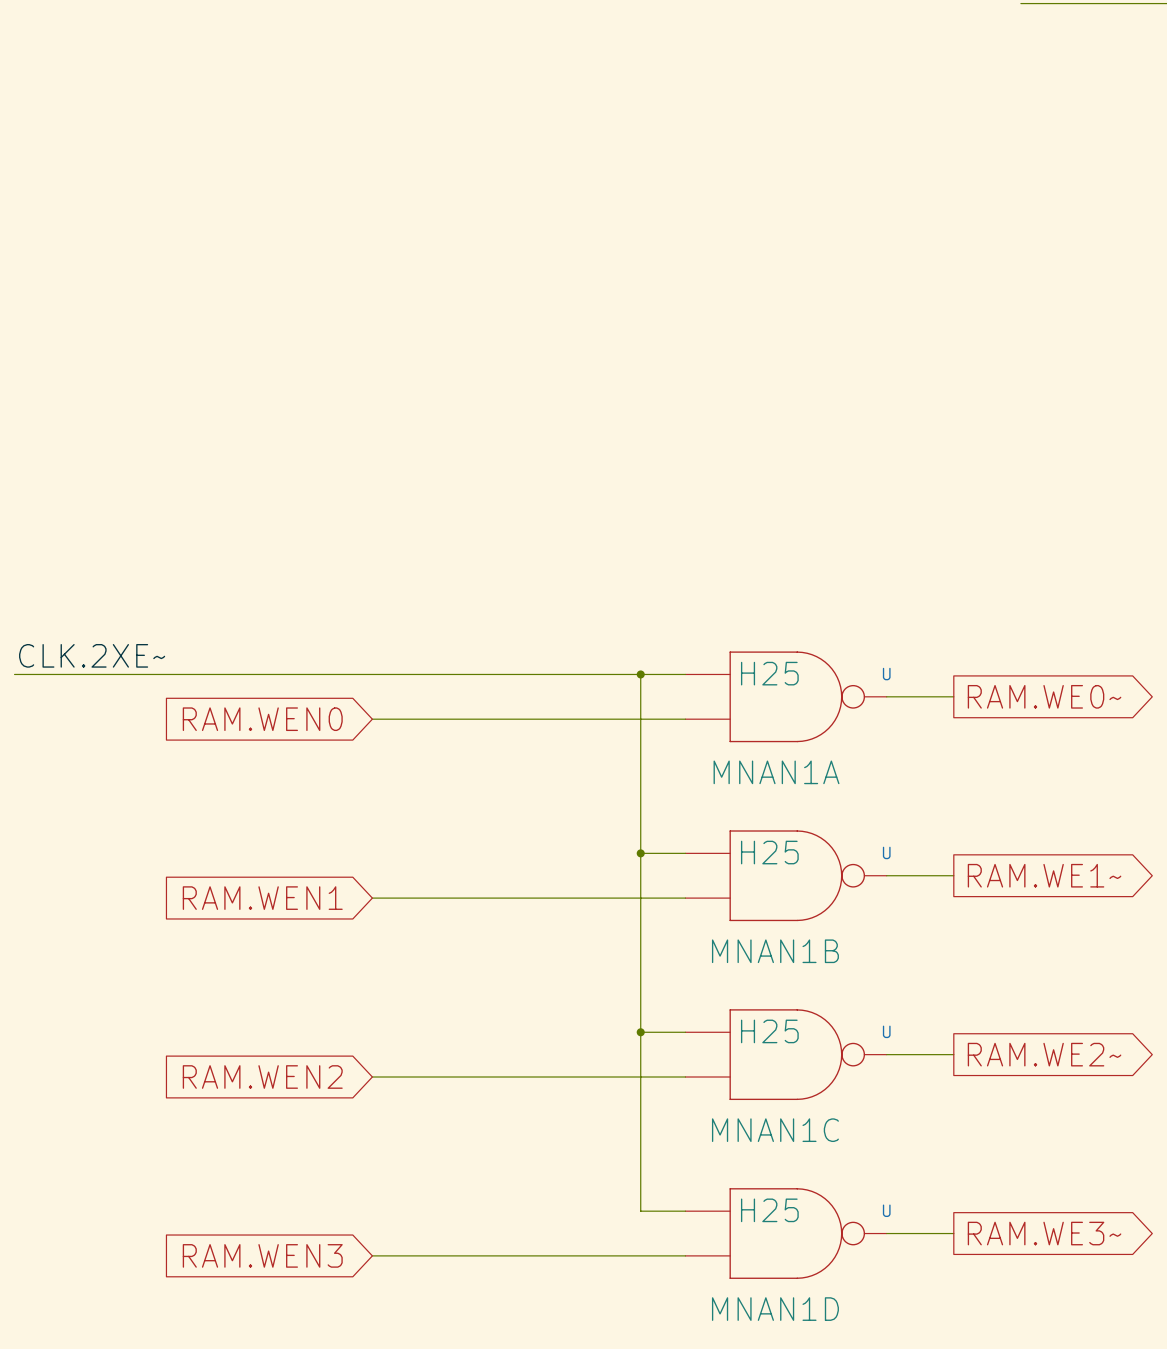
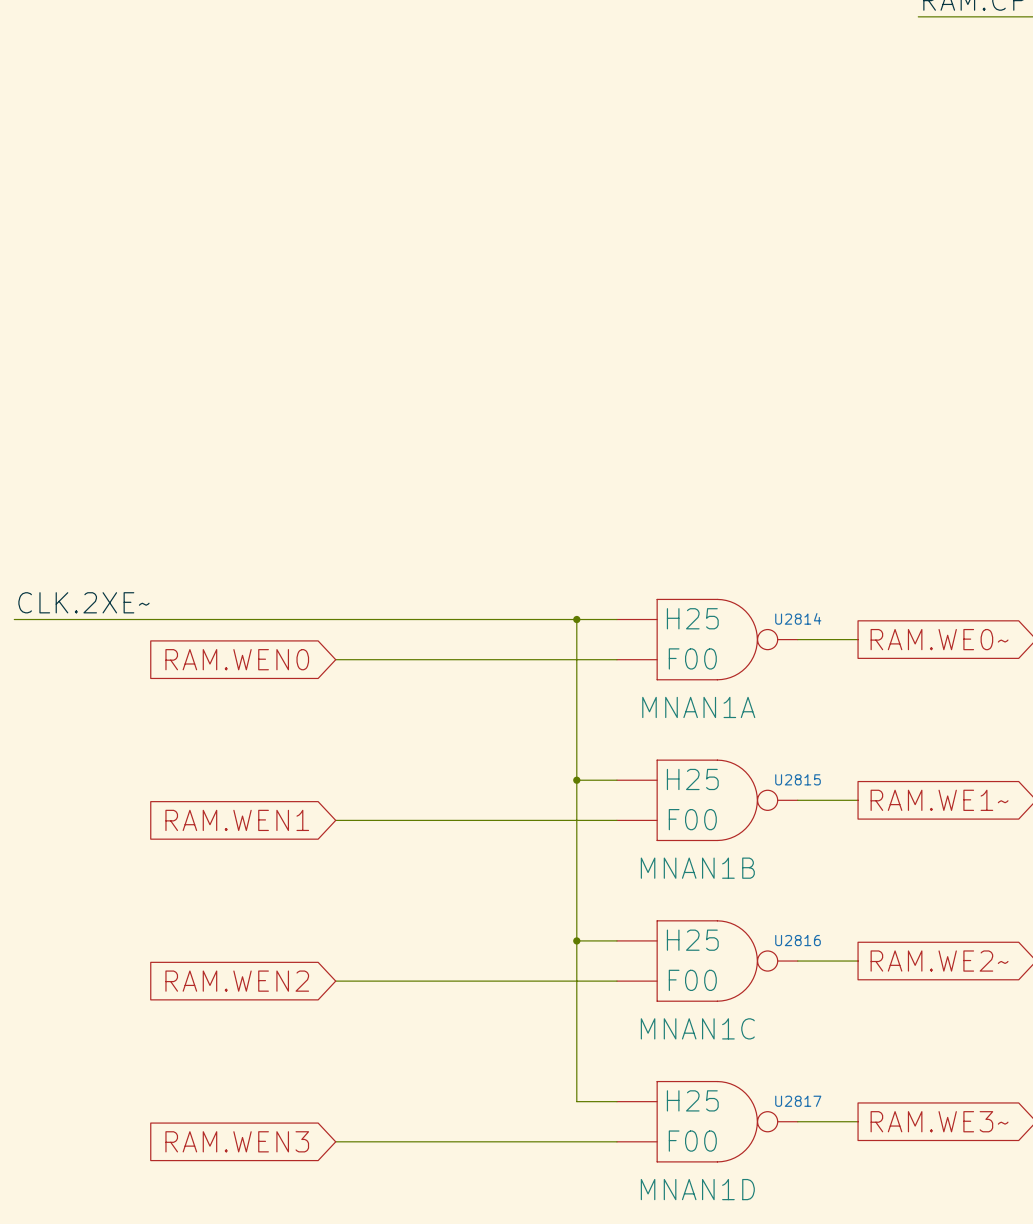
U name: U (886, 674) -> U2814 (798, 618)
U value: none -> F00 (692, 658)
U name: U (886, 852) -> U2815 (798, 779)
U value: none -> F00 (692, 819)
U name: U (886, 1031) -> U2816 (798, 940)
U value: none -> F00 (692, 980)
U name: U (886, 1210) -> U2817 (798, 1101)
U value: none -> F00 (692, 1141)

